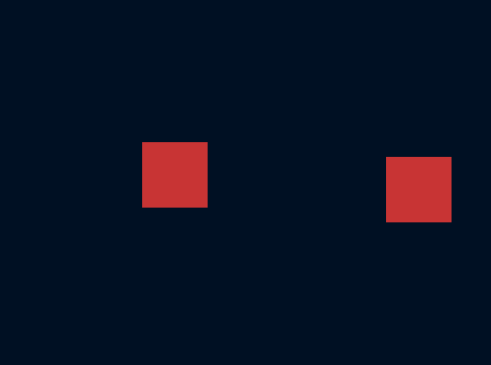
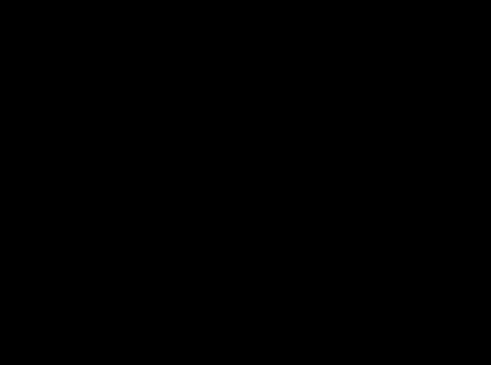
part: (174, 174) -> none
part: (418, 189) -> none

